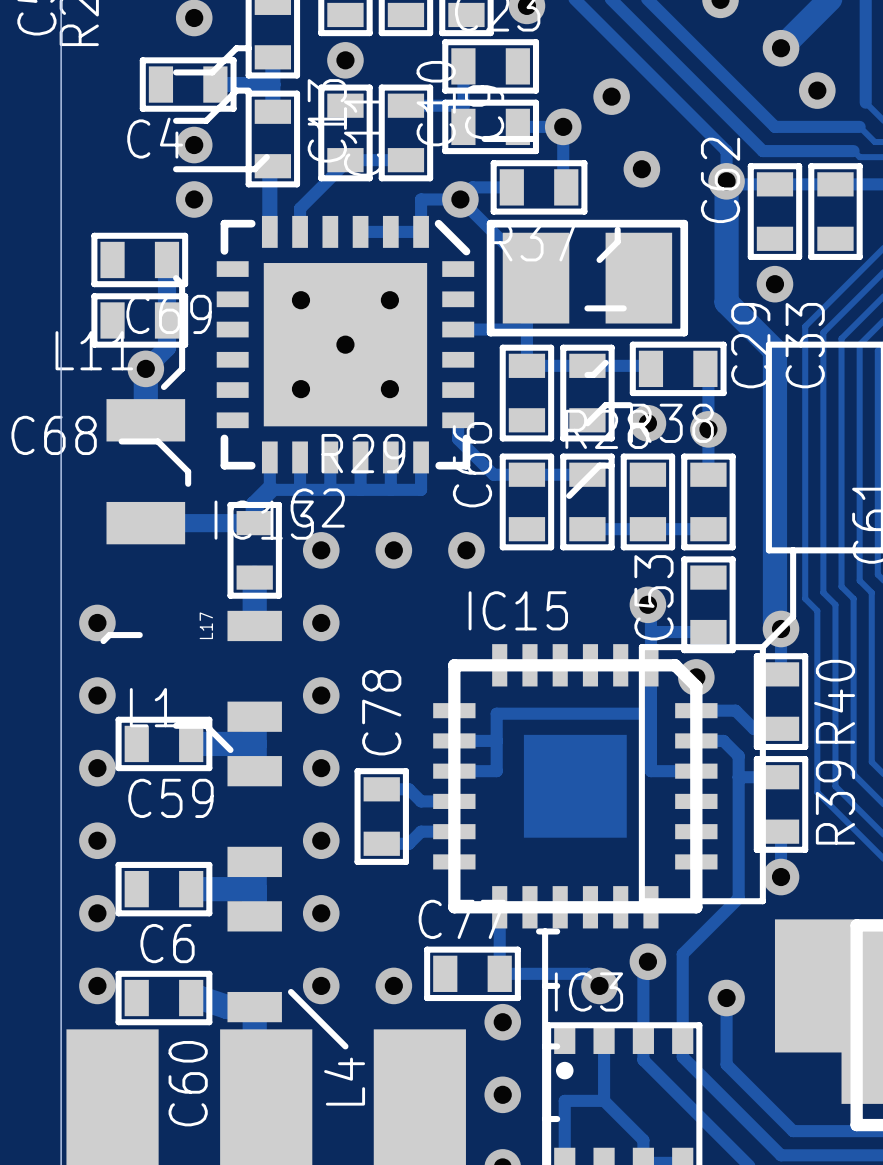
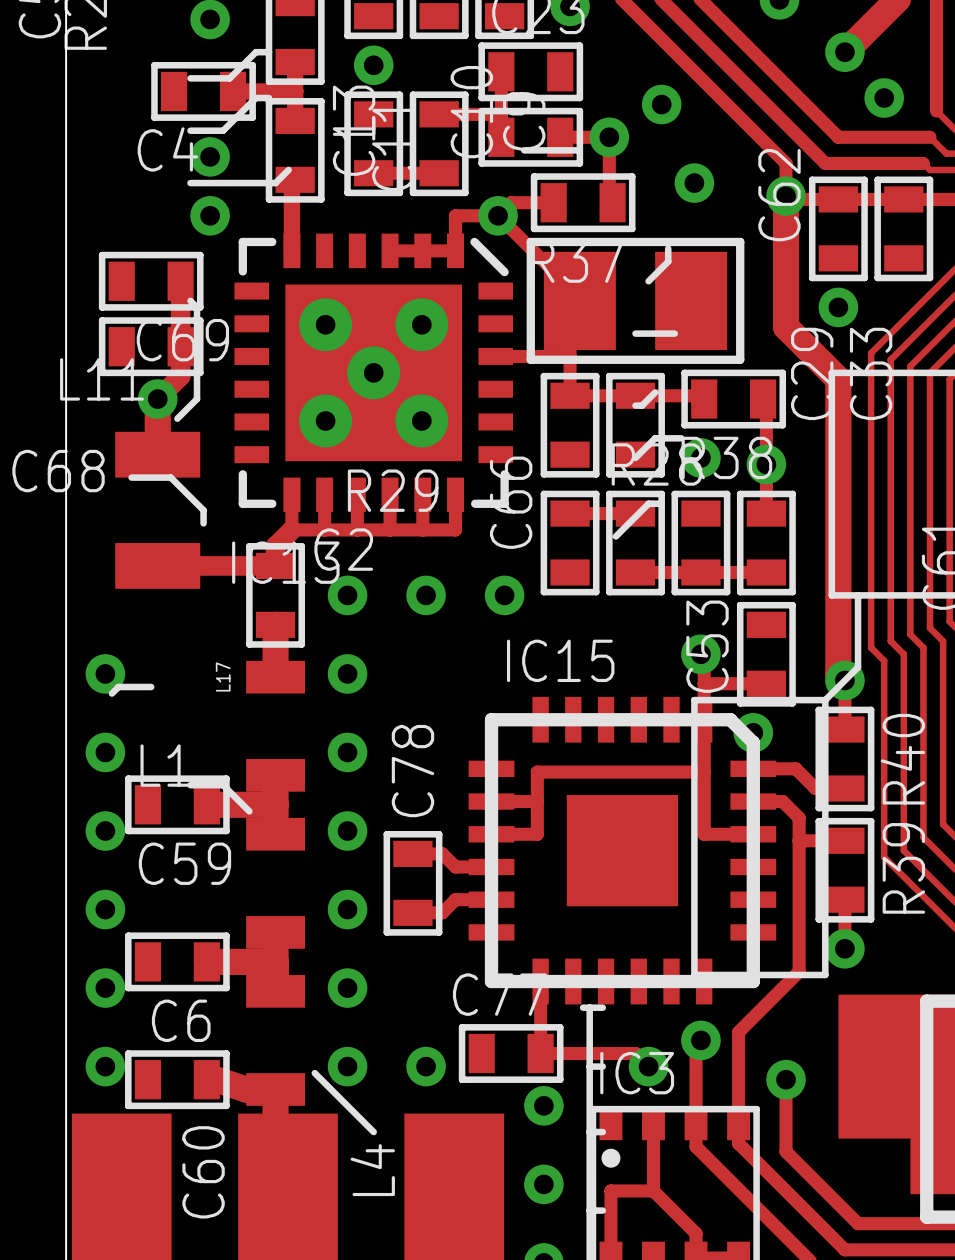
track: (345, 160) (345, 163) (300, 208) (300, 231) -> none
track: (458, 420) (458, 439) (493, 474) (526, 474) -> none

